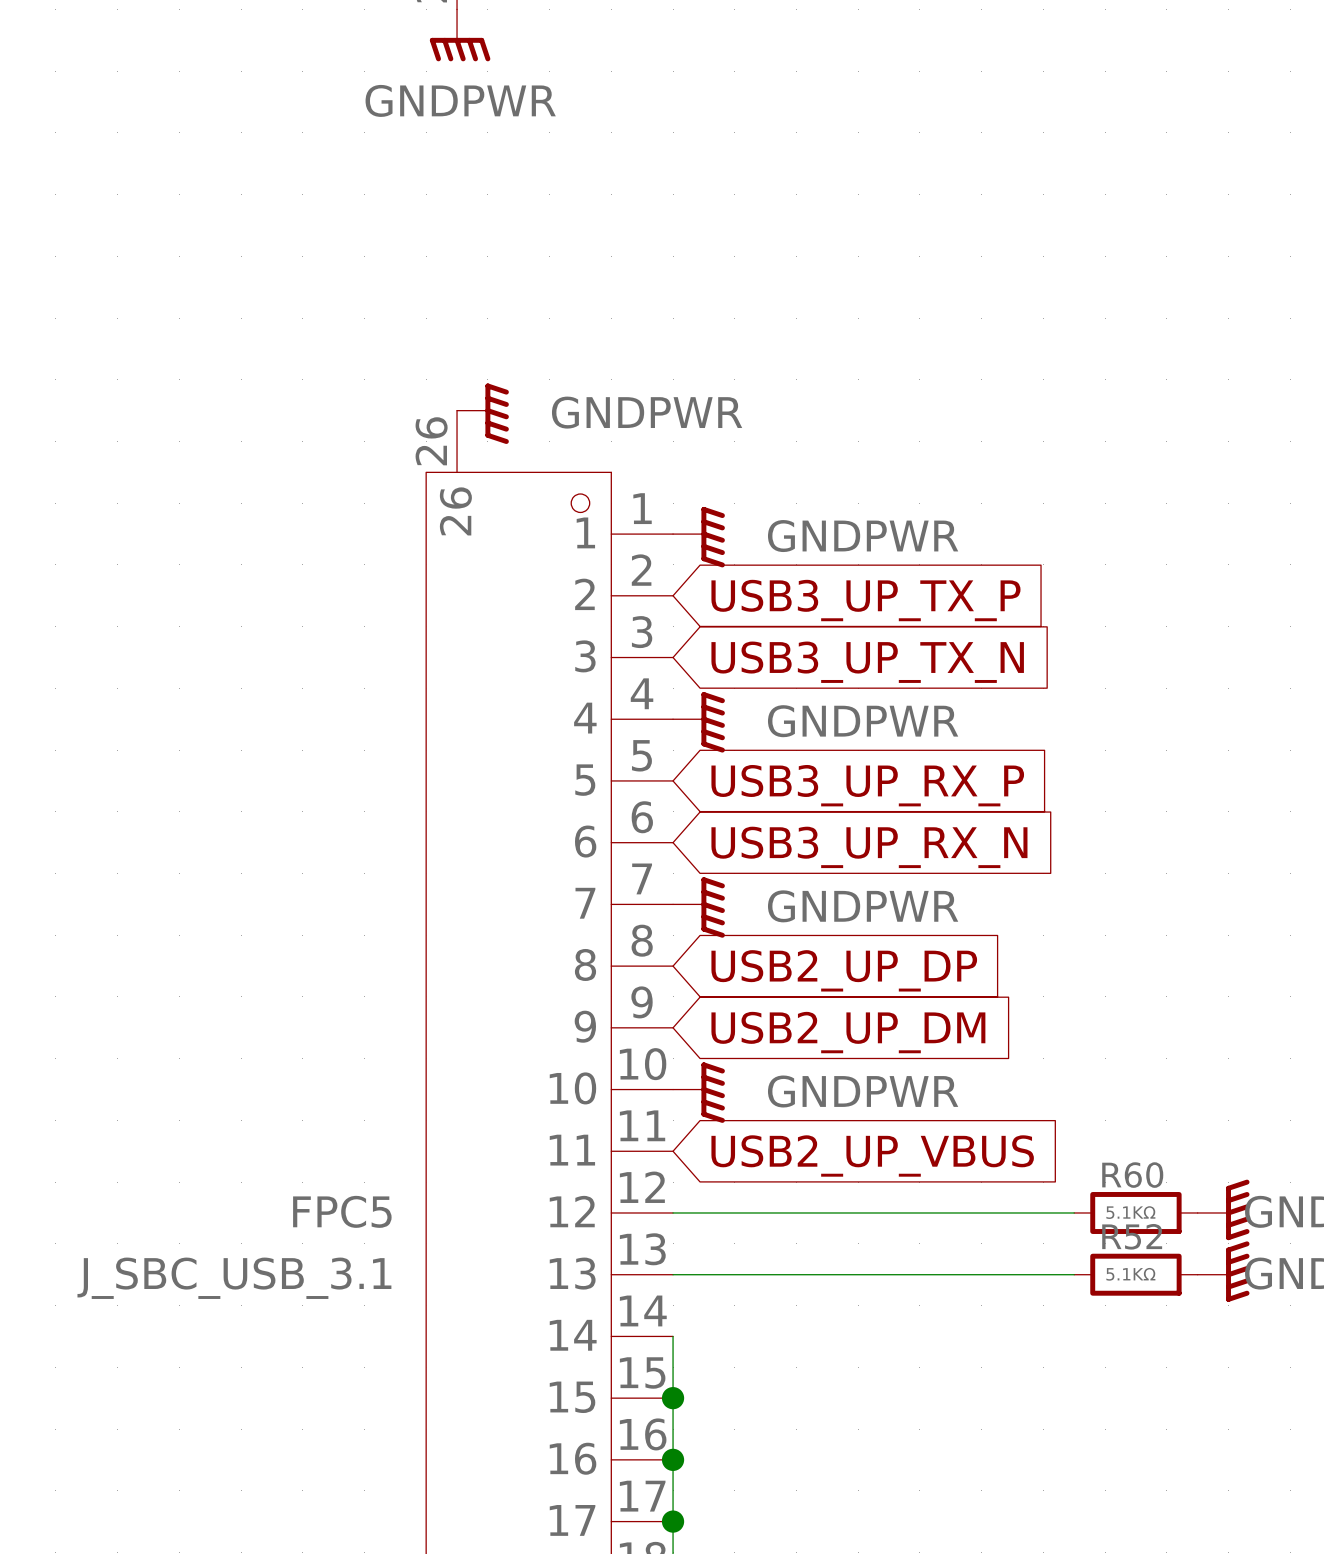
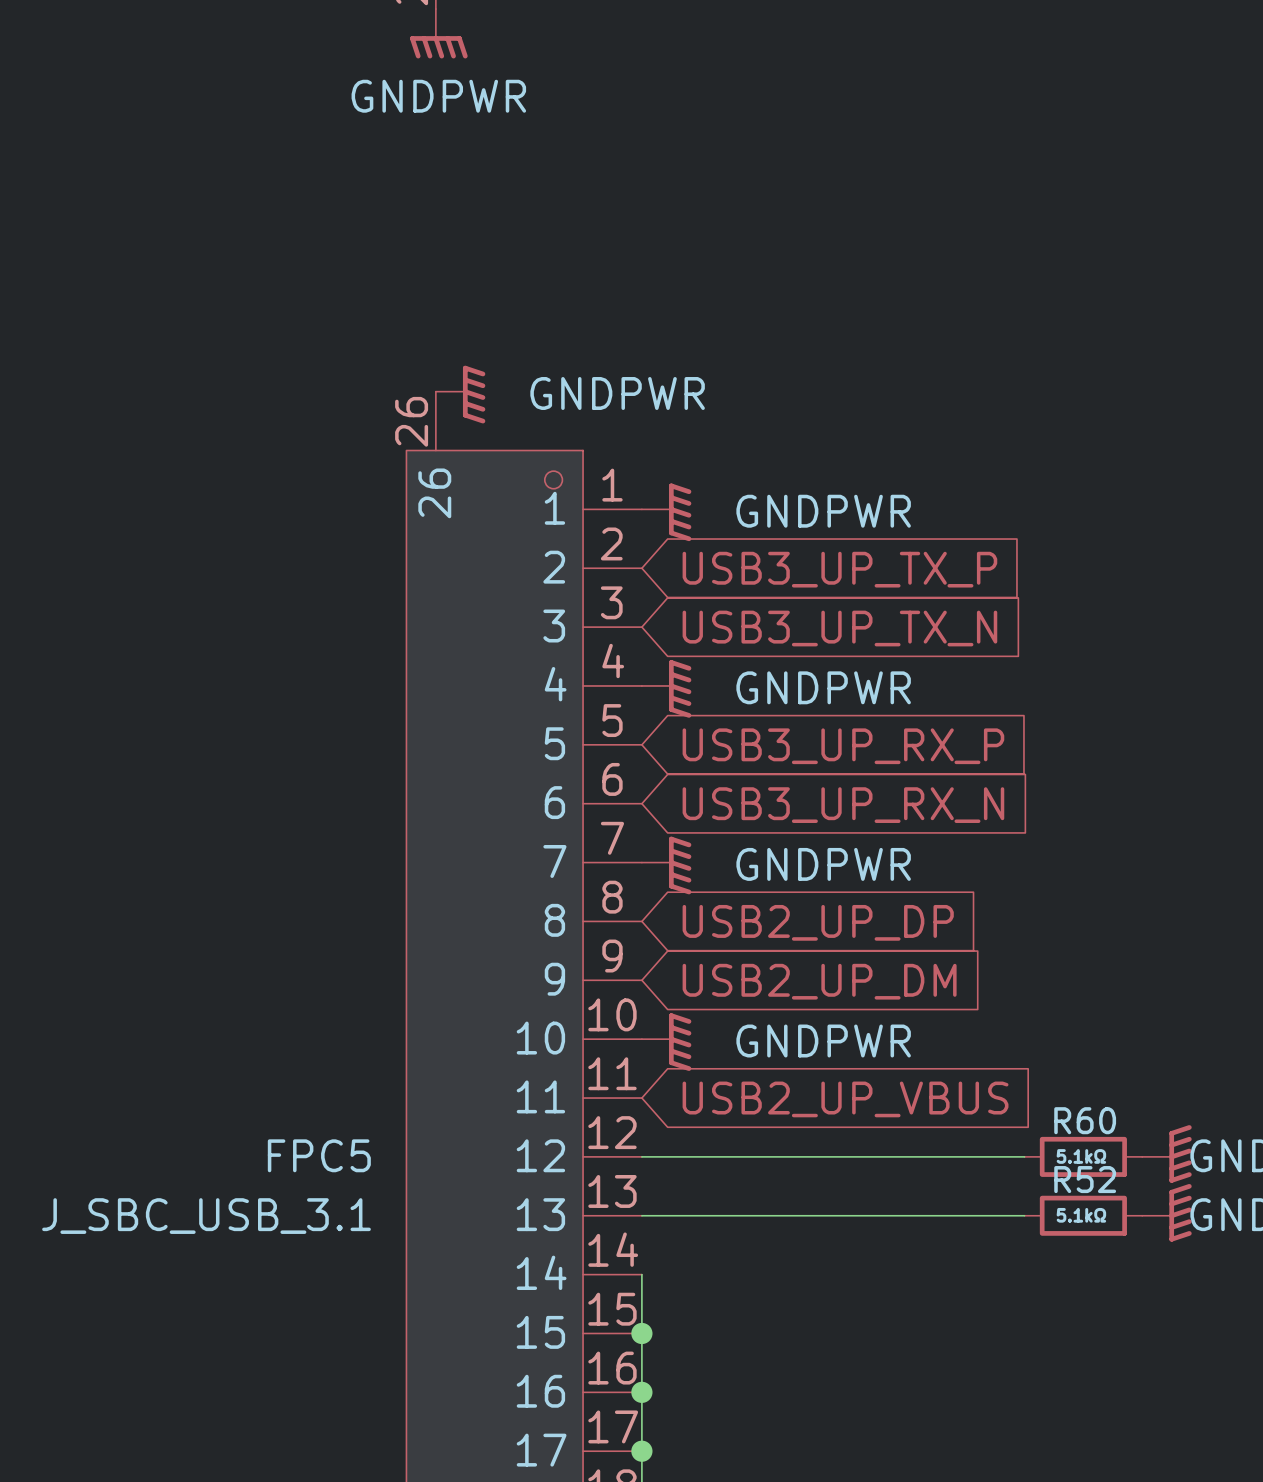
R60 value: 5.1KΩ (1130, 1212) -> 5.1kΩ (1081, 1156)
R52 value: 5.1KΩ (1130, 1274) -> 5.1kΩ (1081, 1215)

